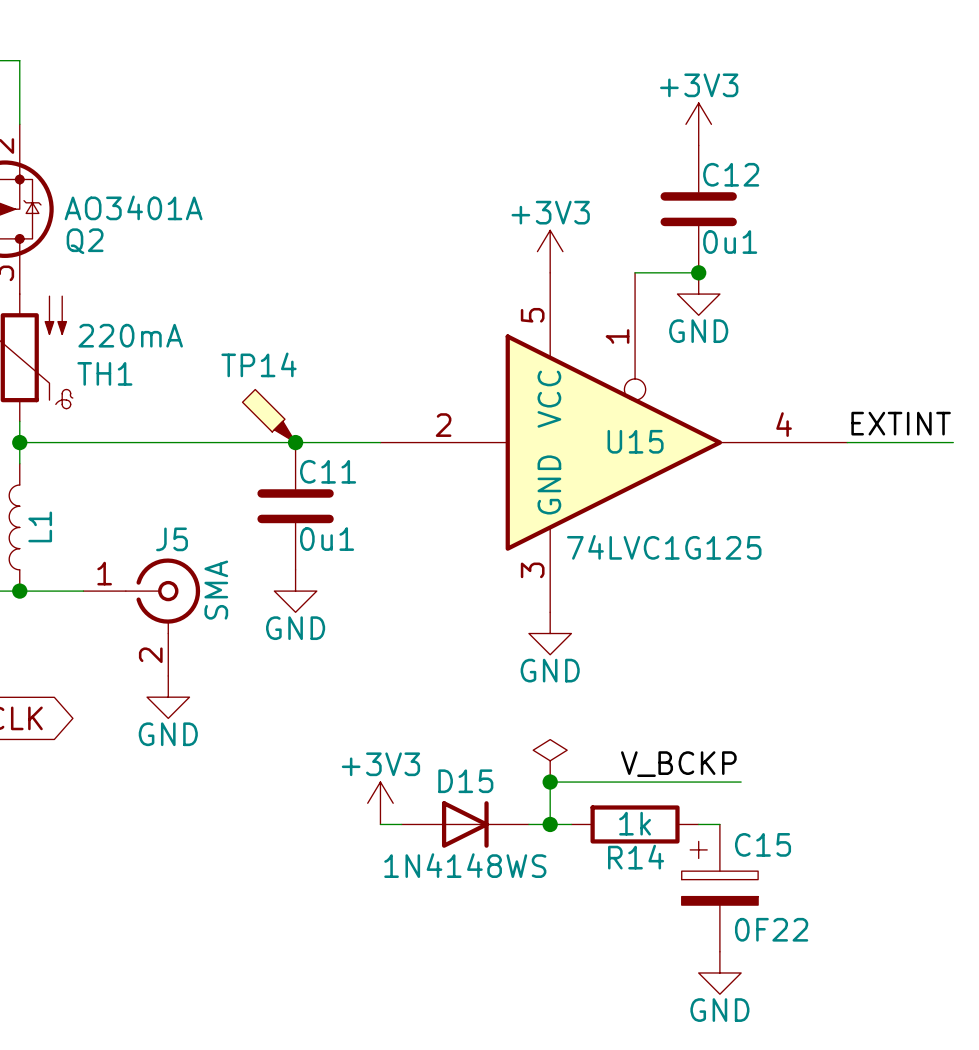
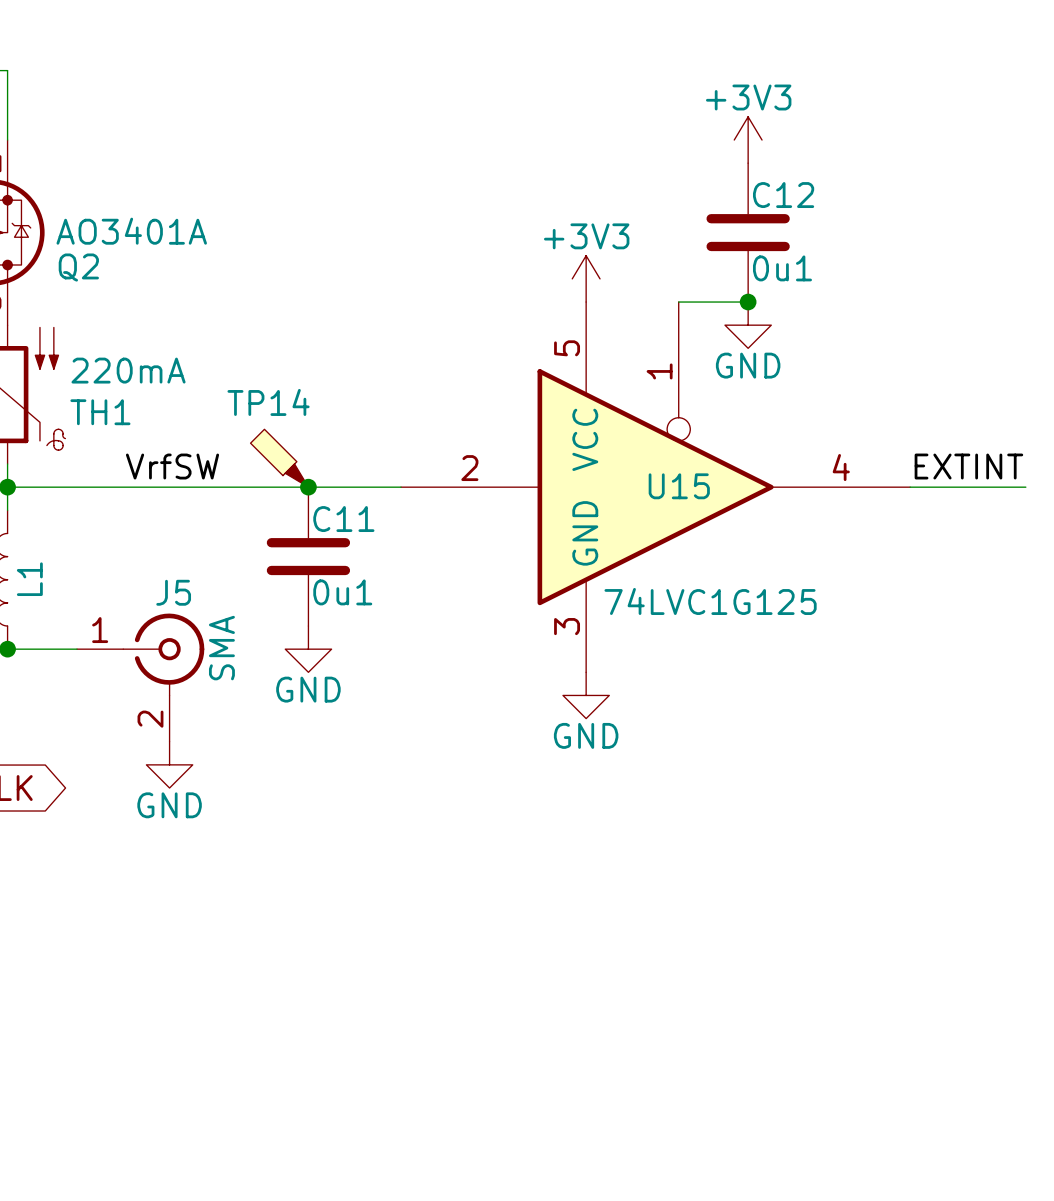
label: none -> VrfSW (172, 466)
power symbol: (550, 760) -> none
label: V_BCKP (678, 764) -> none
junction: (550, 782) -> none
wire: (741, 782) (550, 782) (550, 824) -> none
power symbol: +3V3 (380, 803) -> none
wire: (380, 824) (401, 824) -> none
D15: 1N4148WS (465, 824) -> none
wire: (528, 824) (571, 824) -> none
junction: (550, 824) -> none
R14: 1k (635, 824) -> none
wire: (698, 824) (719, 824) -> none
C15: 0F22 (719, 888) -> none
power symbol: GND (719, 972) -> none

